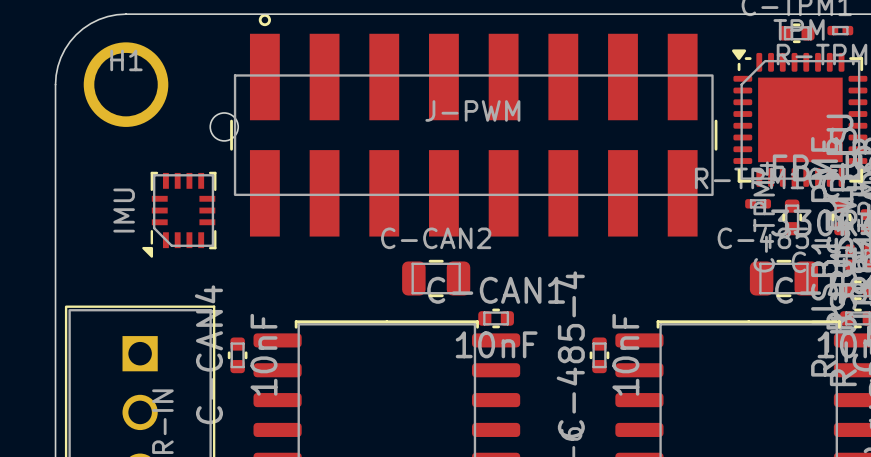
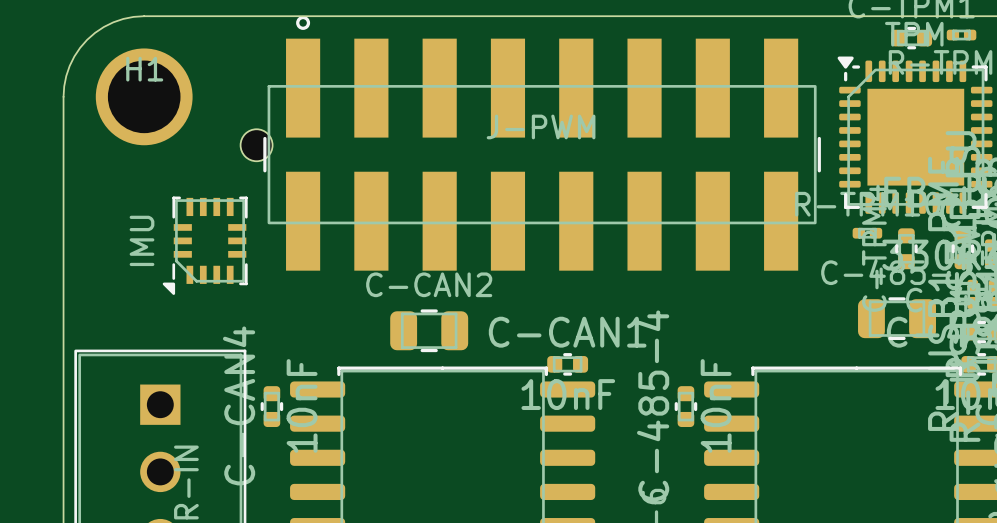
C-CAN2 position: (436, 278) -> (429, 330)

